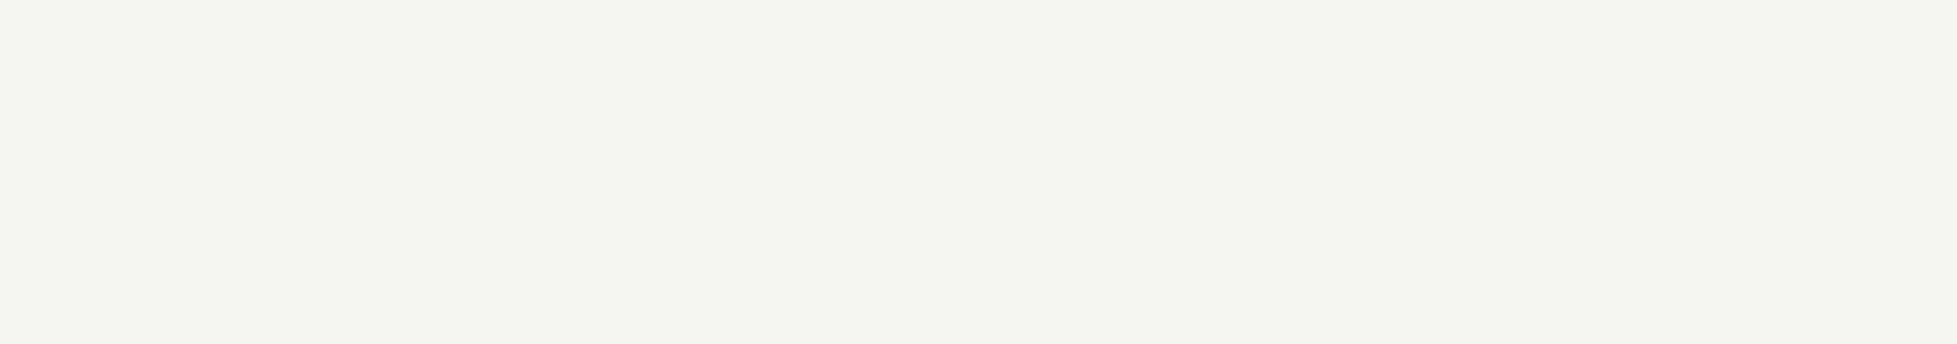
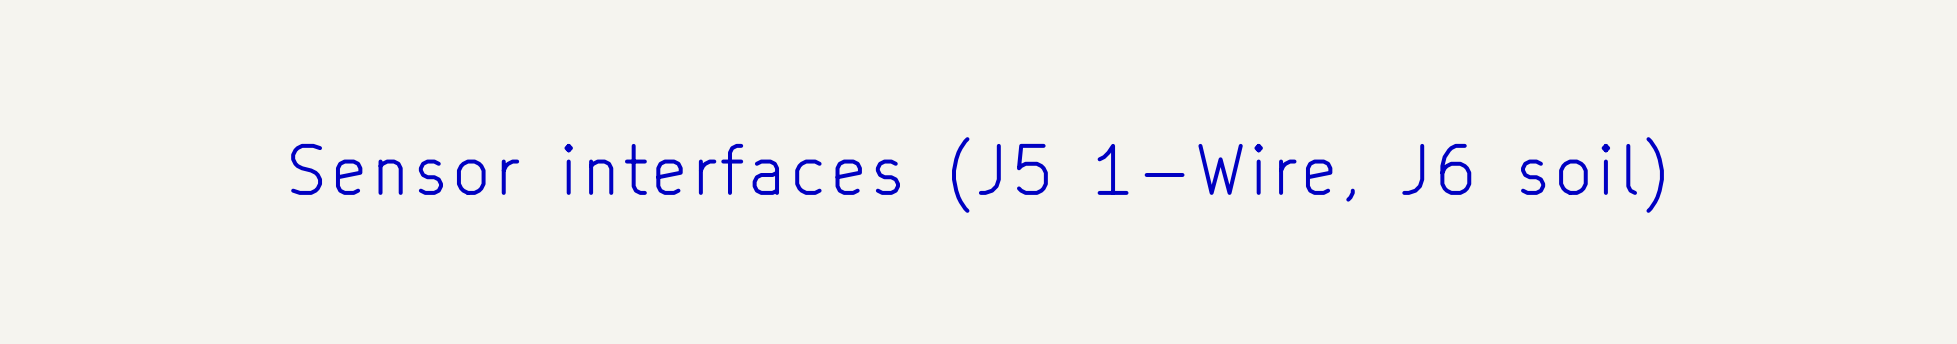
text: none -> Sensor interfaces (J5 1-Wire, J6 soil) (977, 174)

